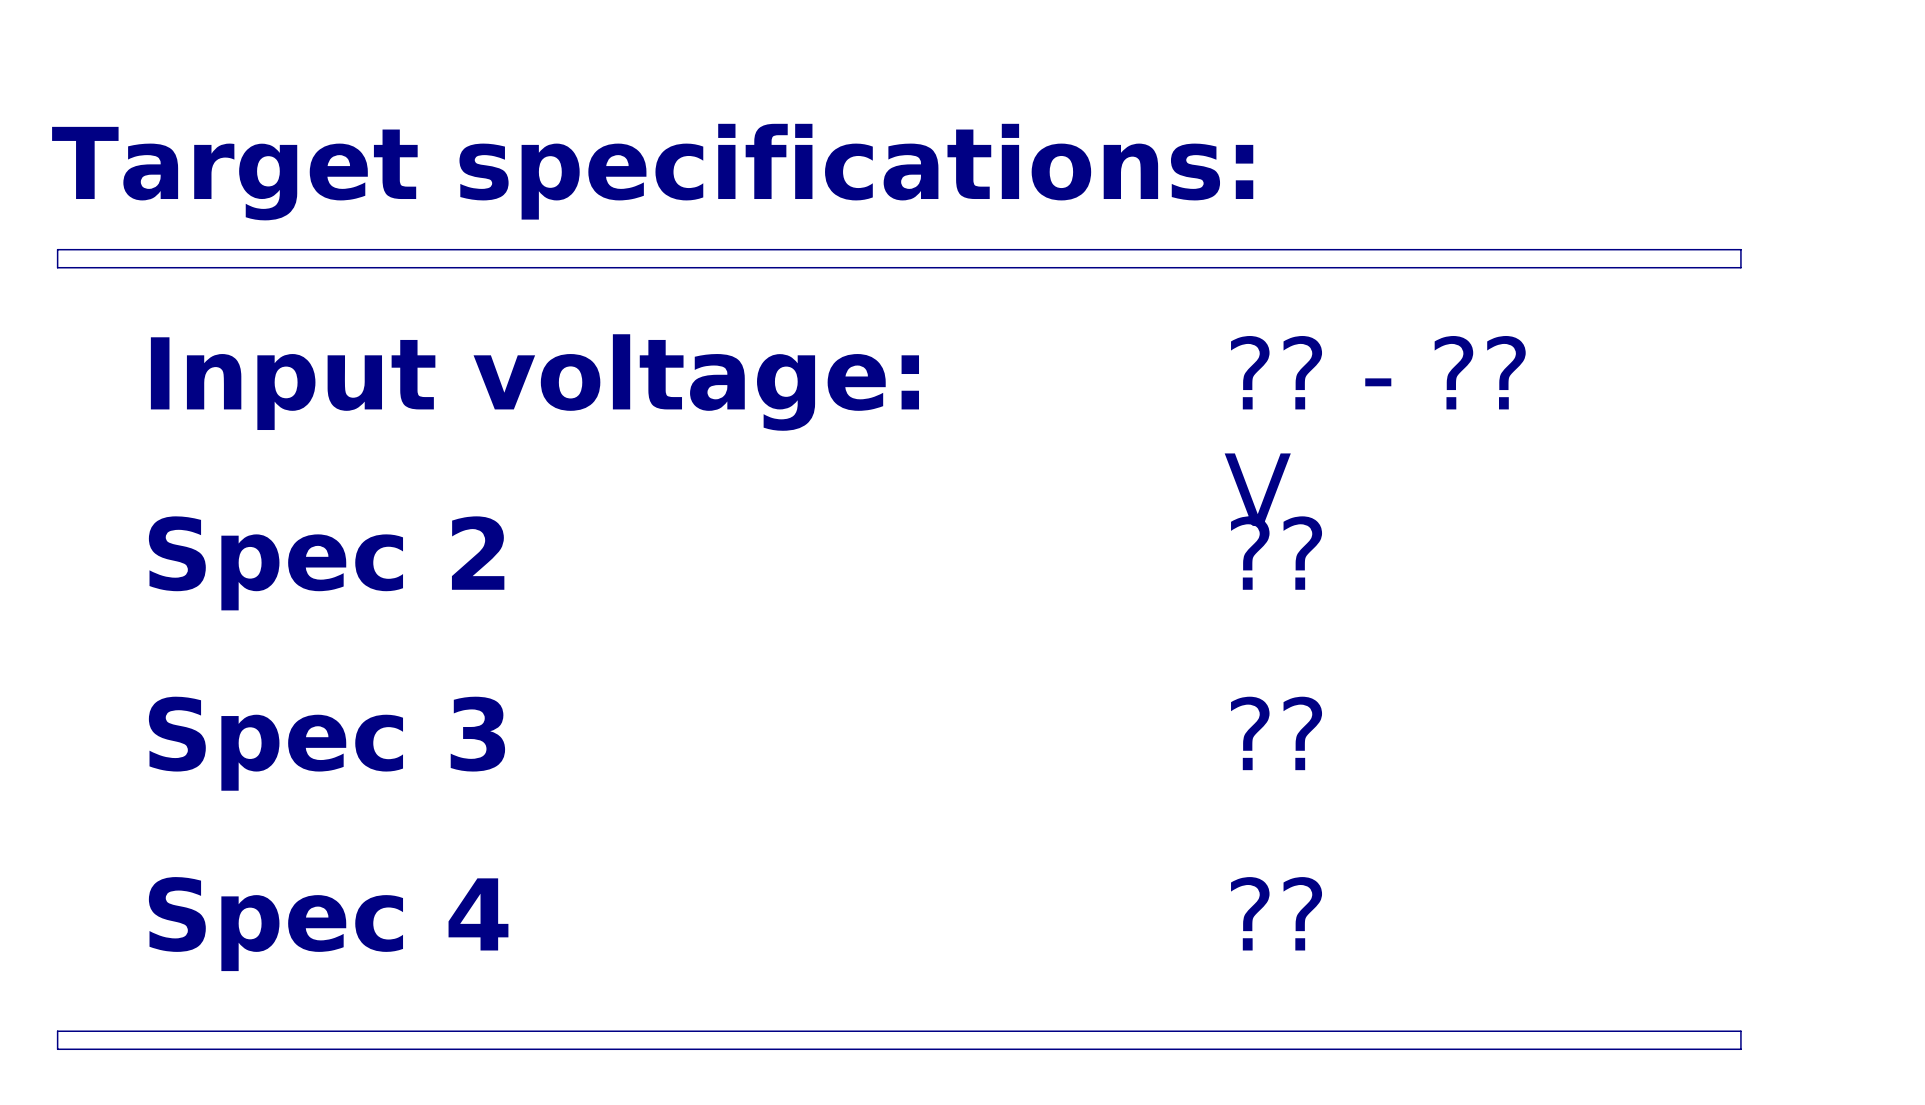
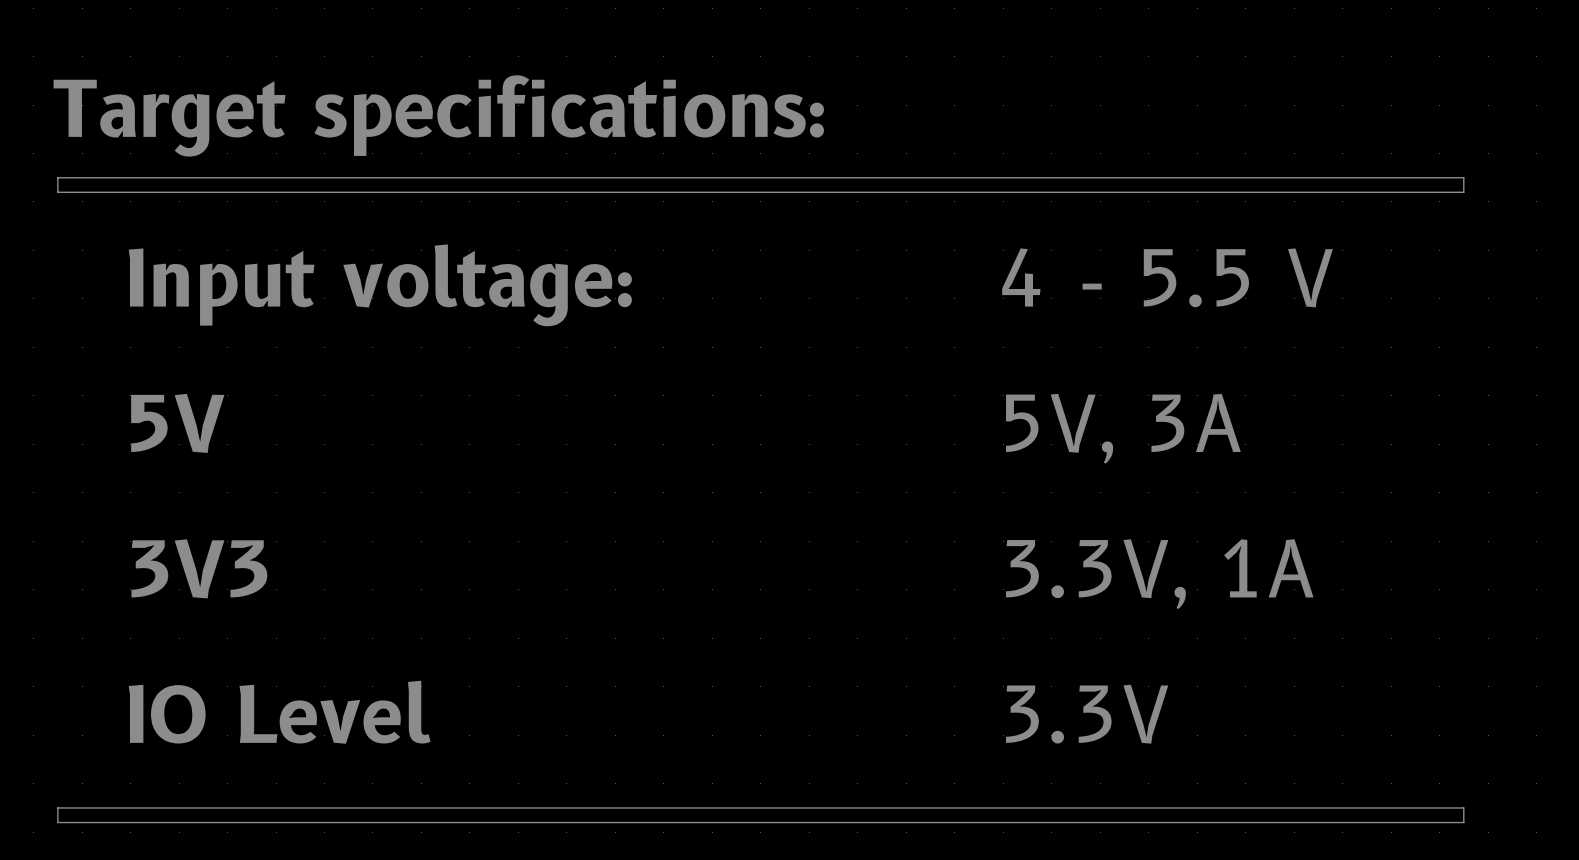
line: (1740, 249) (1740, 267) -> (1415, 177) (1463, 177) (1463, 192) (1415, 192)
text: ?? - ?? (1378, 372) -> 4 - 5.5 V (1167, 277)
text: V (1257, 489) -> none
text: ?? (1276, 553) -> 5V, 3A (1123, 428)
text: Spec 2 (326, 563) -> 5V (177, 423)
text: ?? (1276, 733) -> 3.3V, 1A (1159, 574)
text: Spec 3 (326, 743) -> 3V3 (199, 568)
text: ?? (1276, 913) -> 3.3V (1087, 714)
text: Spec 4 (328, 924) -> IO Level (279, 712)
line: (1740, 1031) (1740, 1049) -> (1415, 807) (1463, 807) (1463, 822) (1415, 822)

